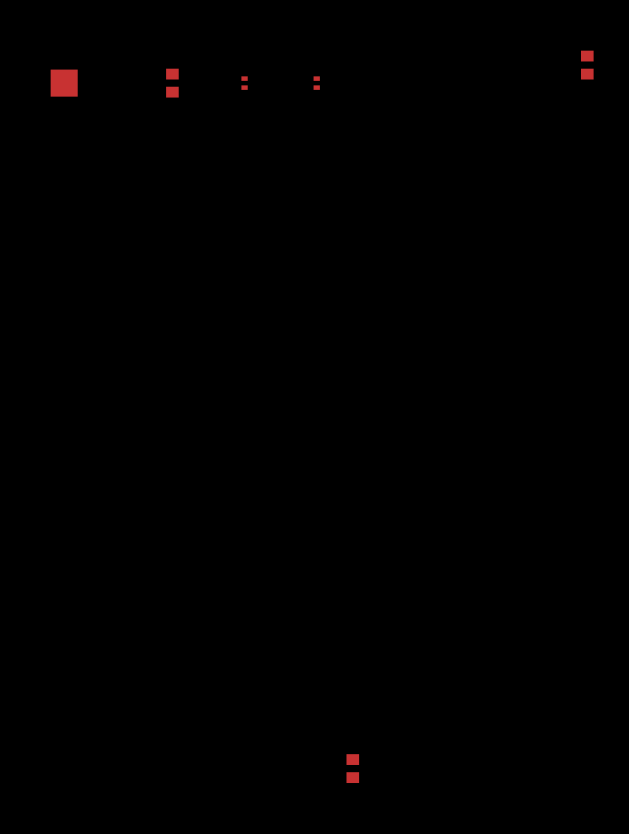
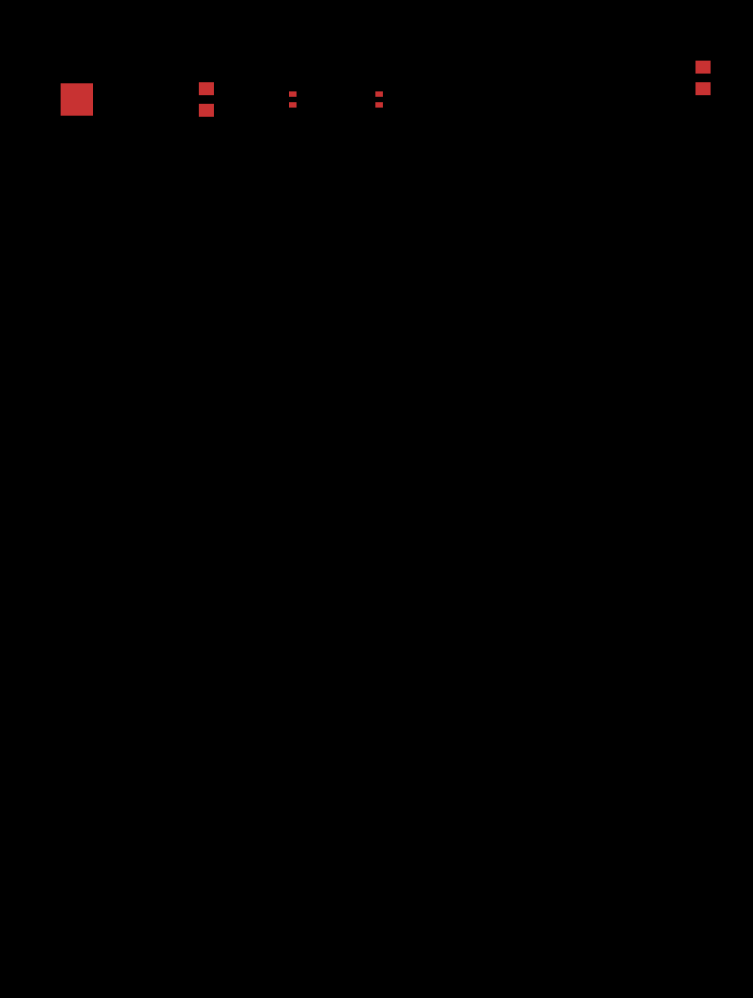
part: (352, 768) -> none

